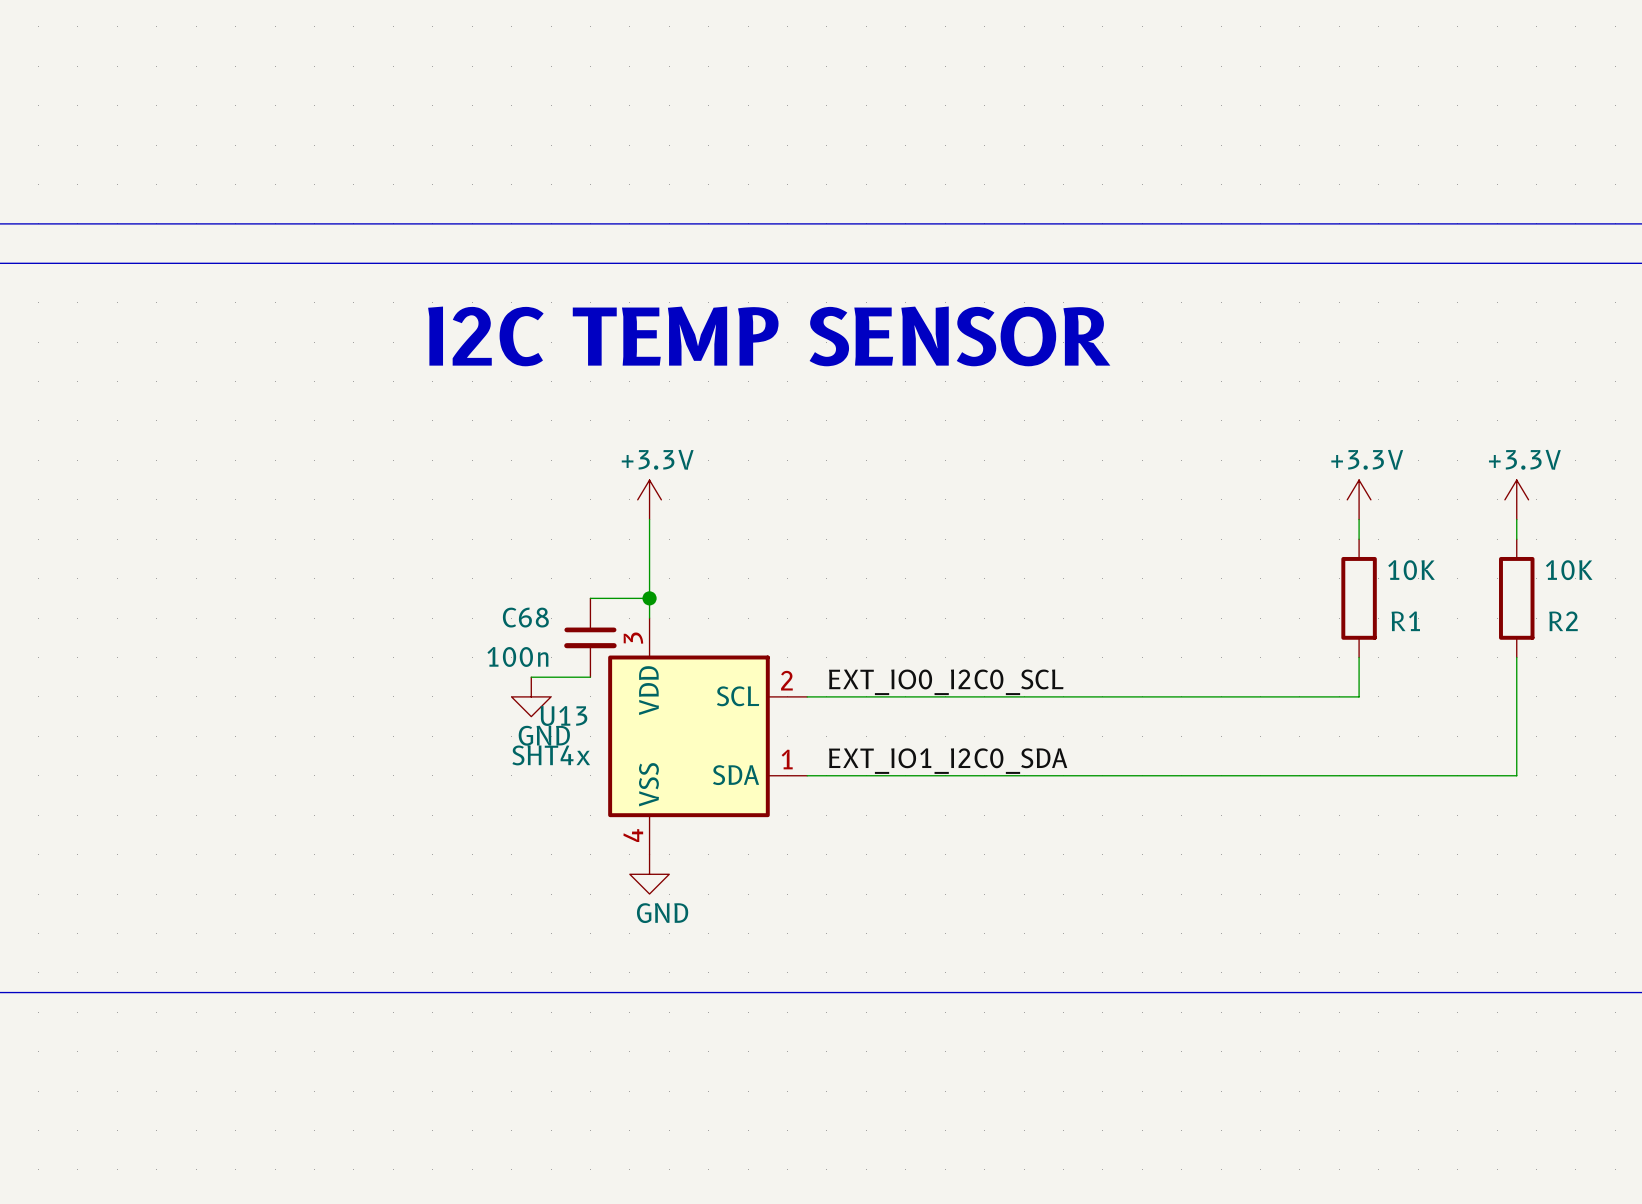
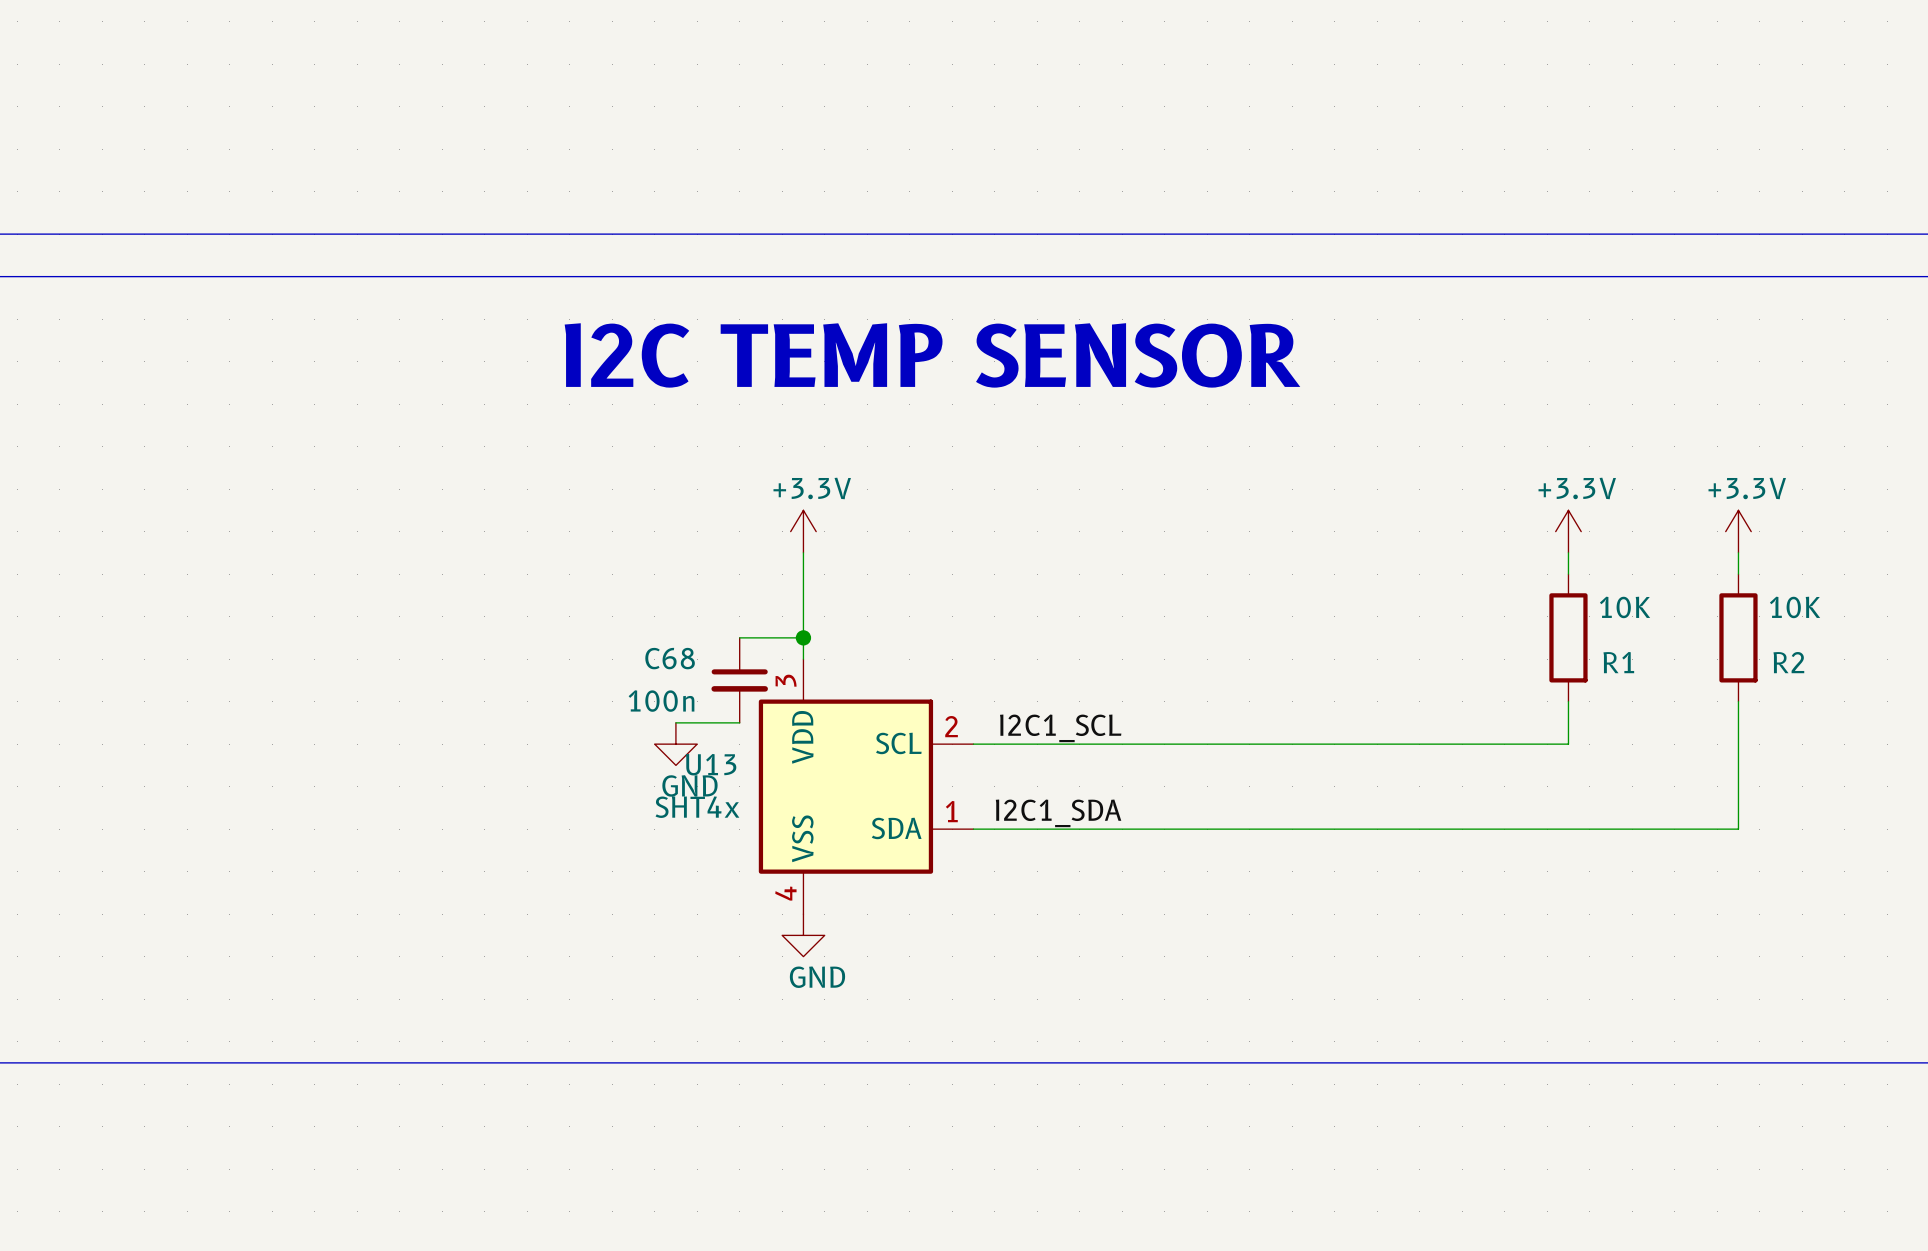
label: none -> I2C1_SCL (1060, 728)
label: EXT_IO0_I2C0_SCL (946, 682) -> none
label: none -> I2C1_SDA (1058, 813)
label: EXT_IO1_I2C0_SDA (948, 761) -> none

